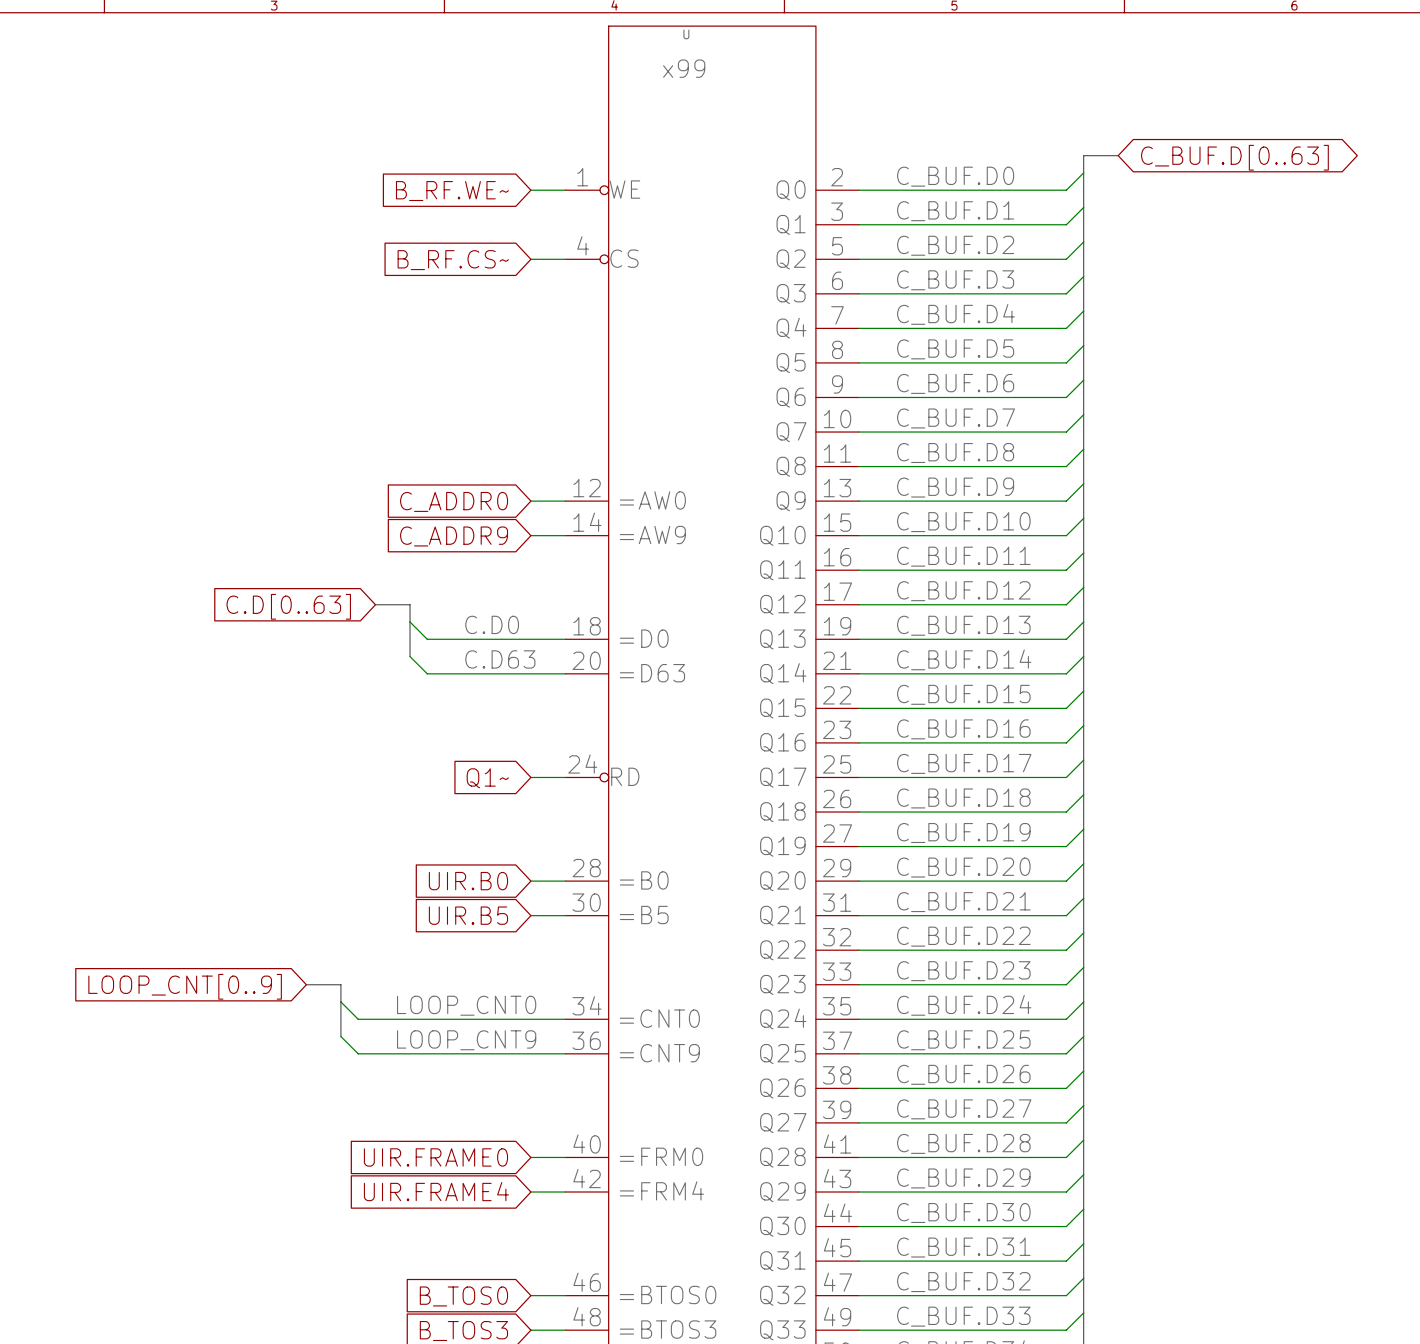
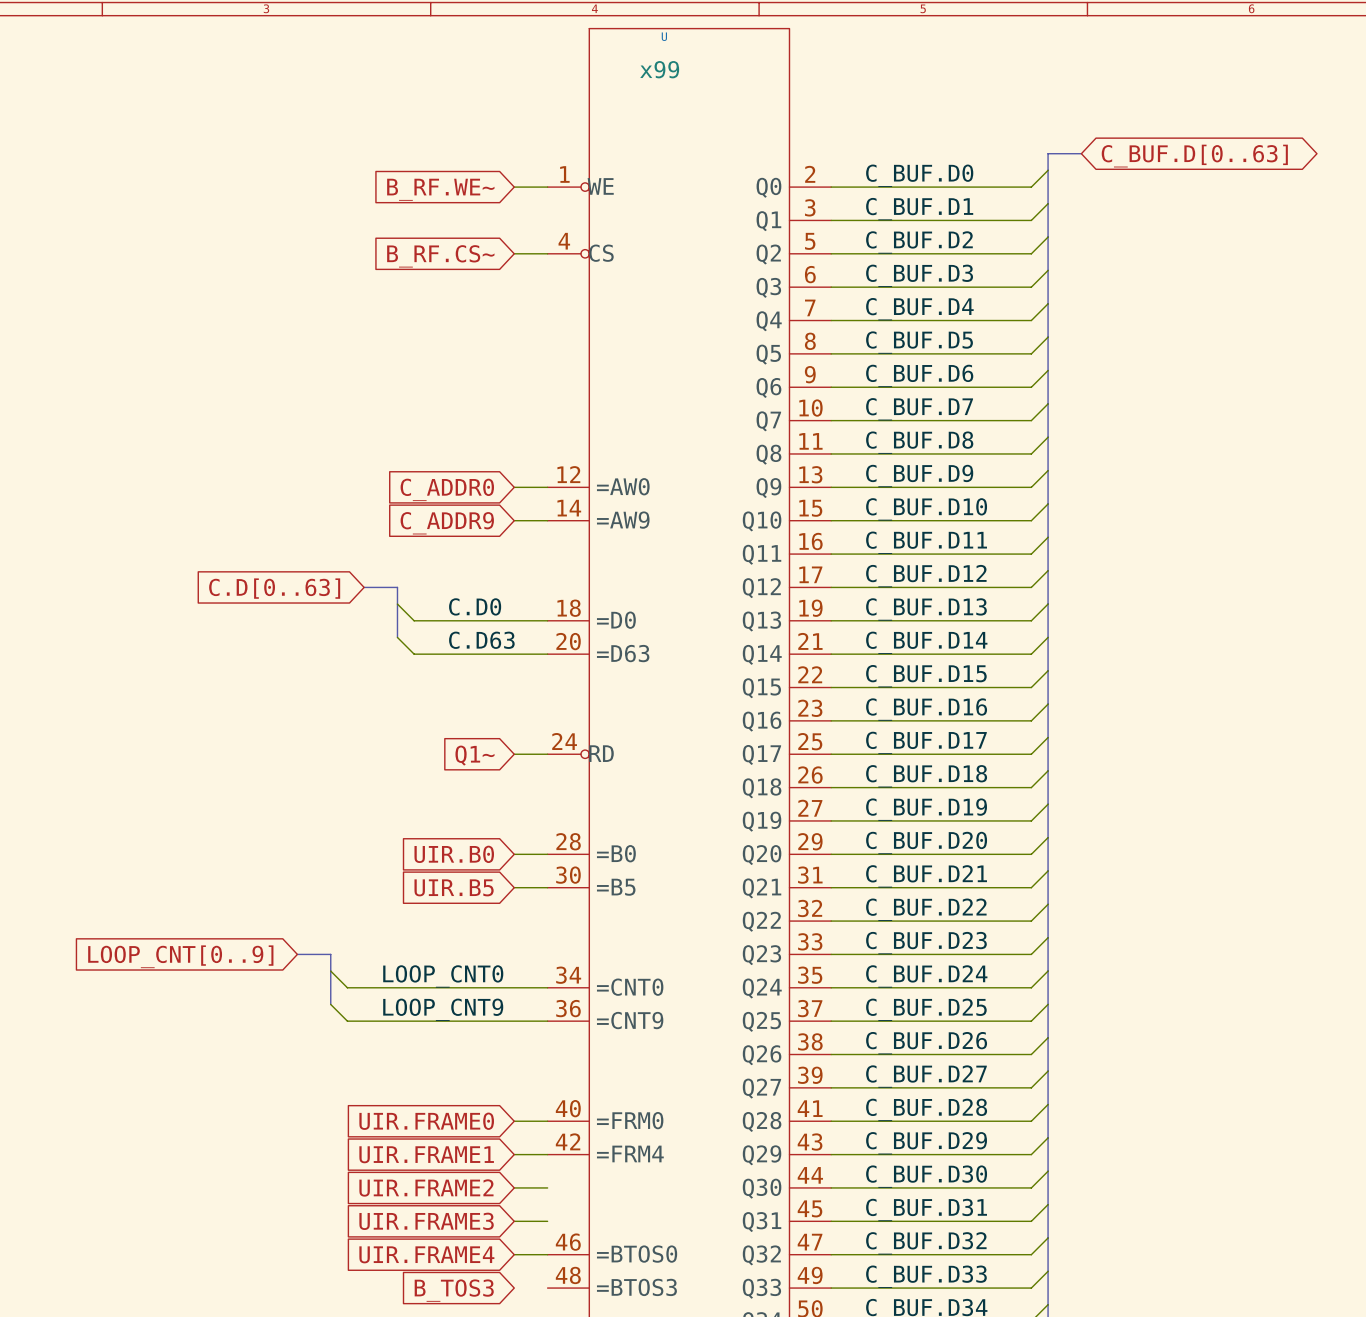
global label: UIR.FRAME4 (436, 1191) -> UIR.FRAME1 (426, 1154)
global label: none -> UIR.FRAME2 (426, 1187)
wire: none -> (514, 1187) (547, 1187)
global label: none -> UIR.FRAME3 (426, 1221)
global label: B_TOS0 (463, 1296) -> UIR.FRAME4 (426, 1254)
wire: (530, 1330) (565, 1330) -> (514, 1221) (547, 1221)

